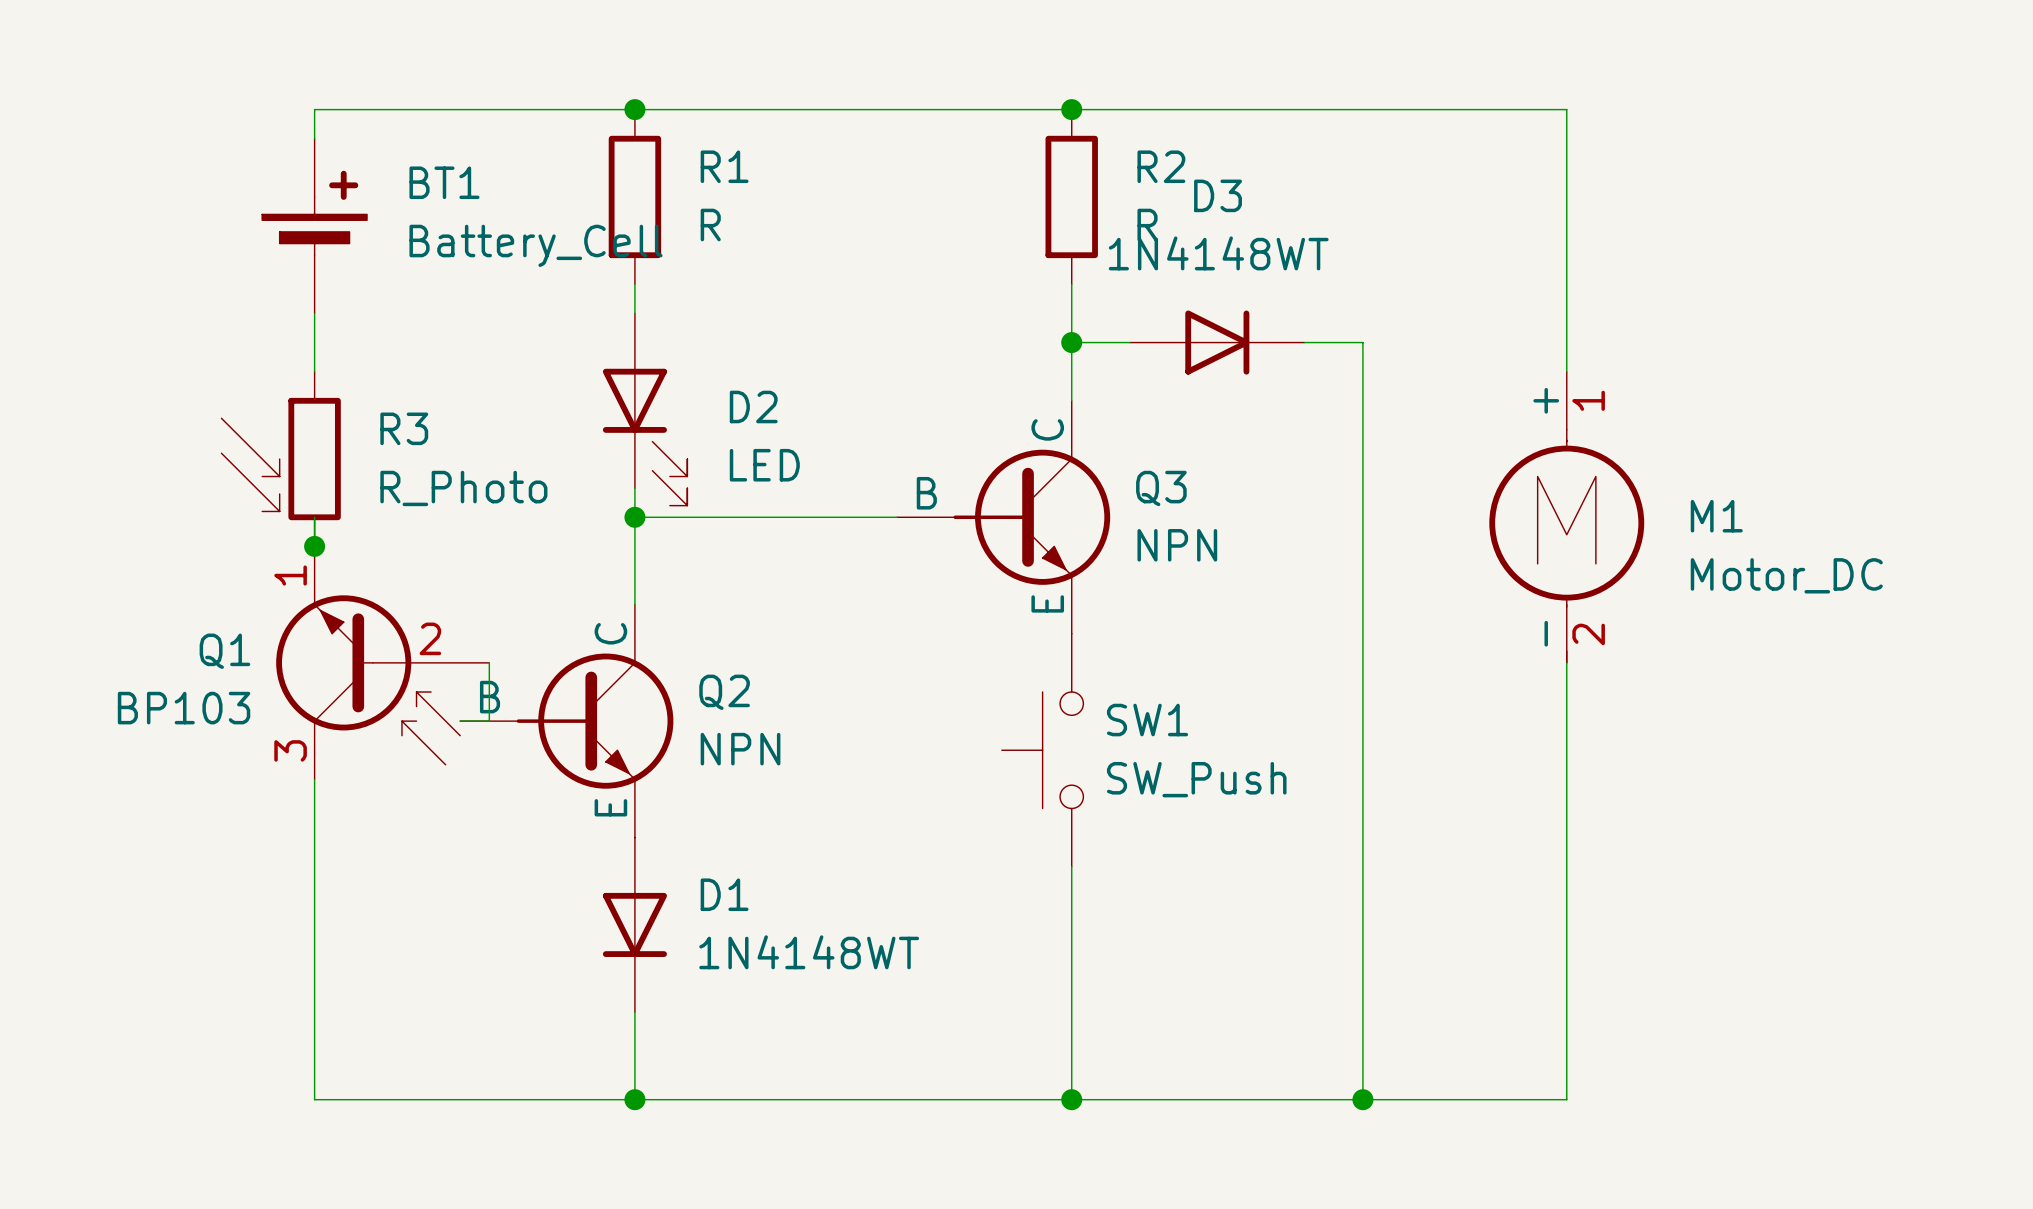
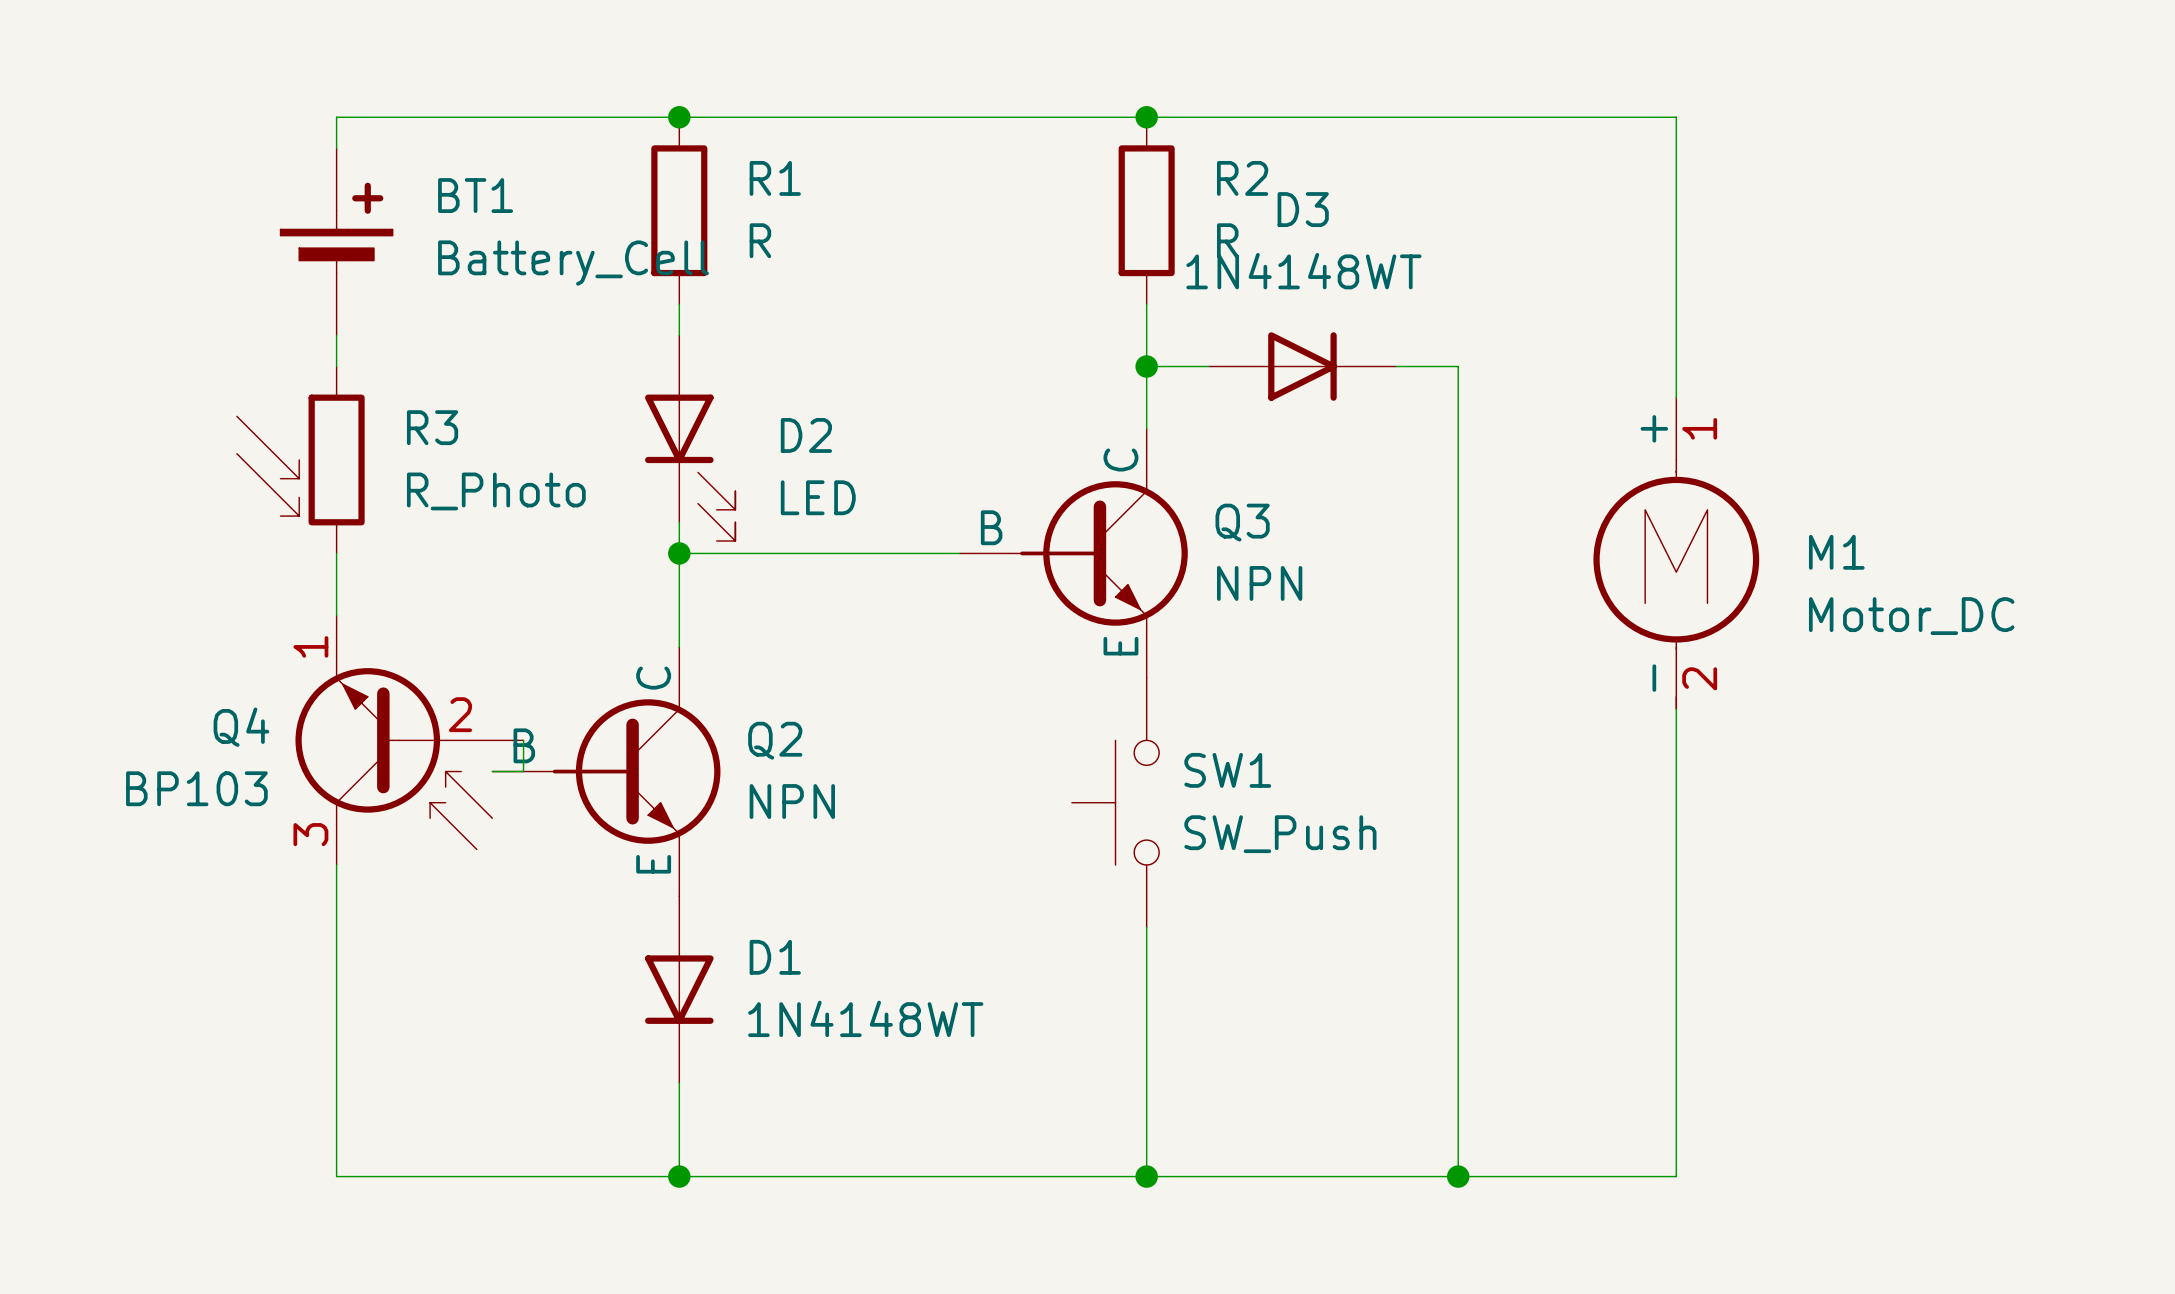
R3 position: (281, 459) -> (300, 459)
junction: (314, 546) -> none
Q1: BP103 (382, 662) -> none
wire: (489, 662) (489, 692) -> none
Q4: none -> BP103 (409, 740)

